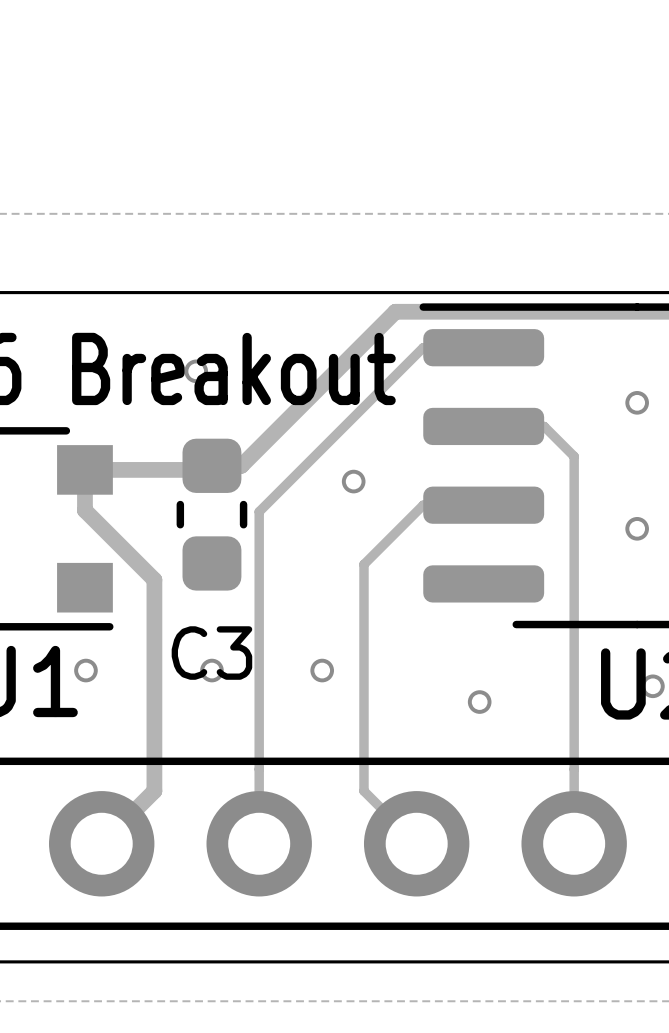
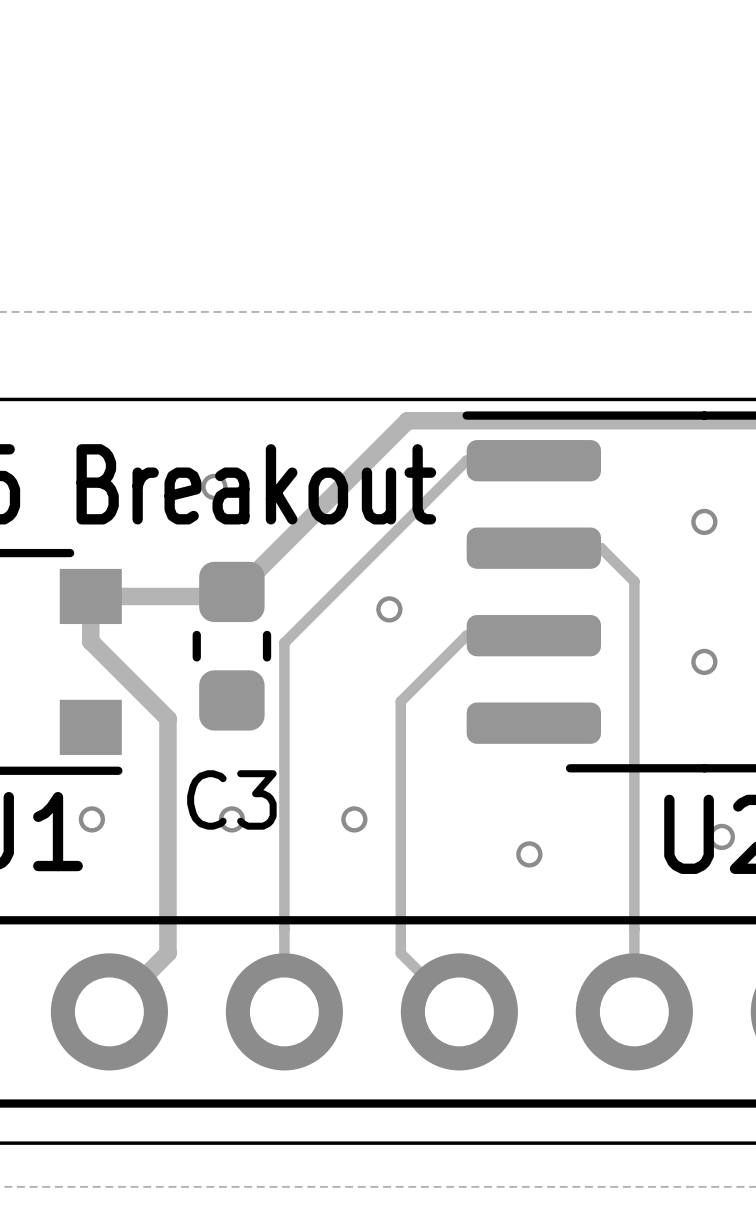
track: (395, 311) (241, 465) (216, 465) -> (435, 420) (407, 420) (236, 591)

